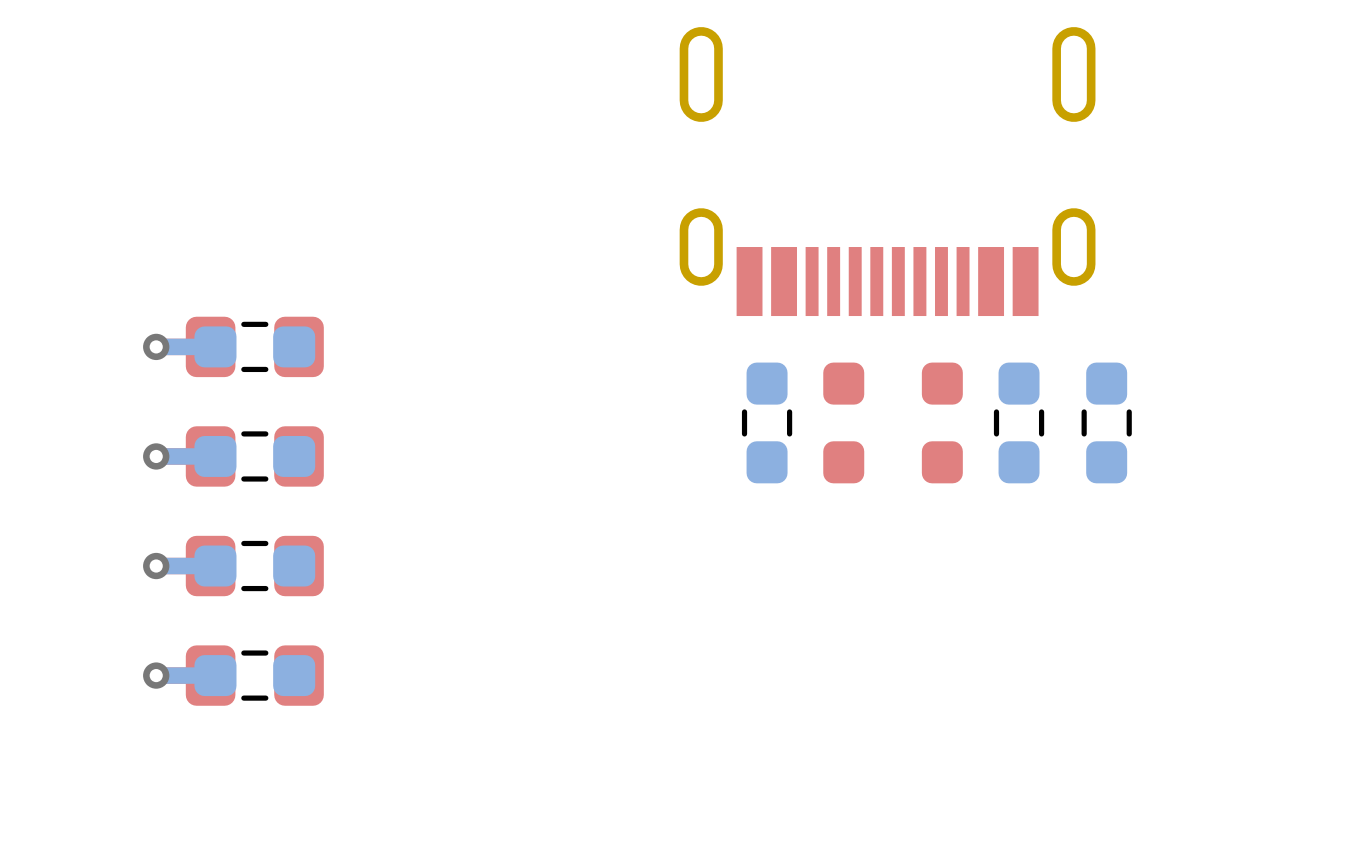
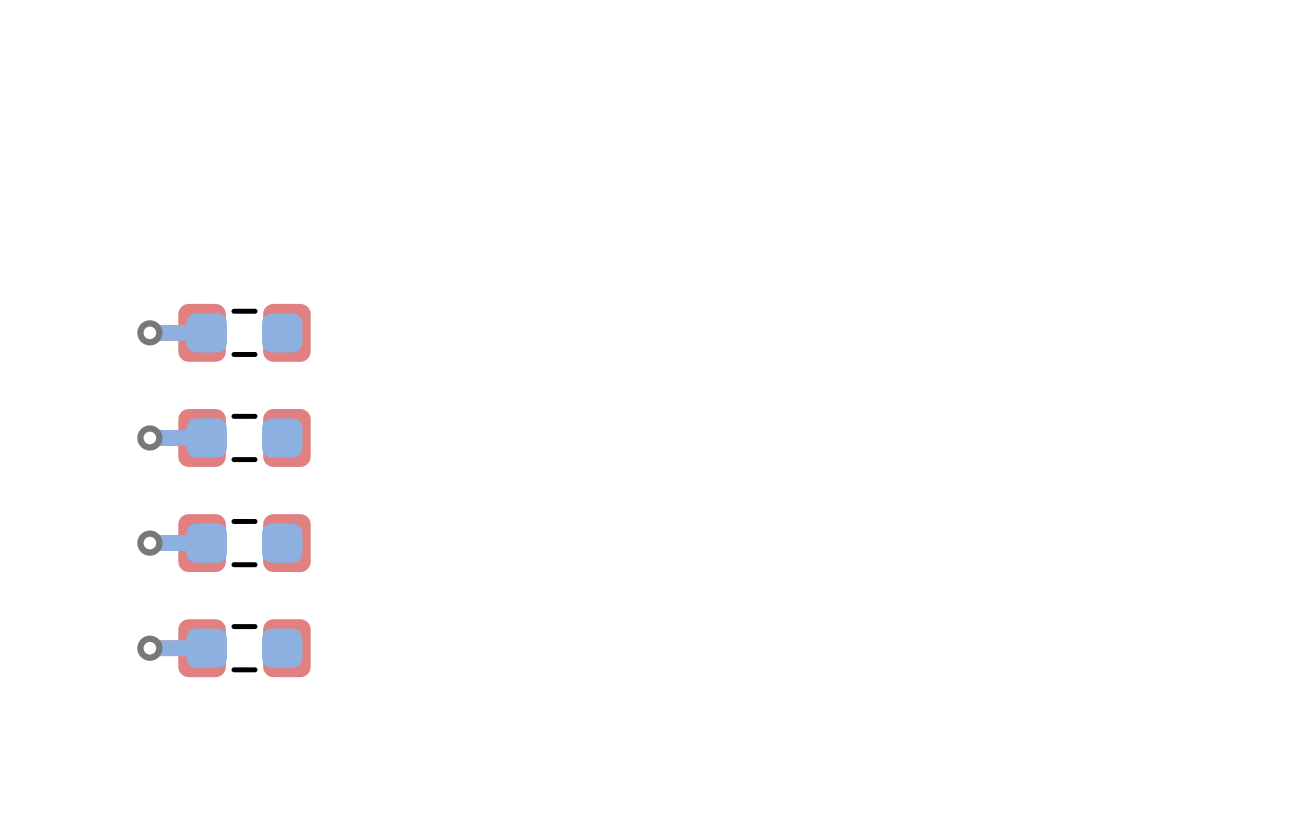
part: (887, 171) -> none
part: (767, 422) -> none
part: (843, 422) -> none
part: (942, 422) -> none
part: (1019, 422) -> none
part: (1106, 422) -> none

